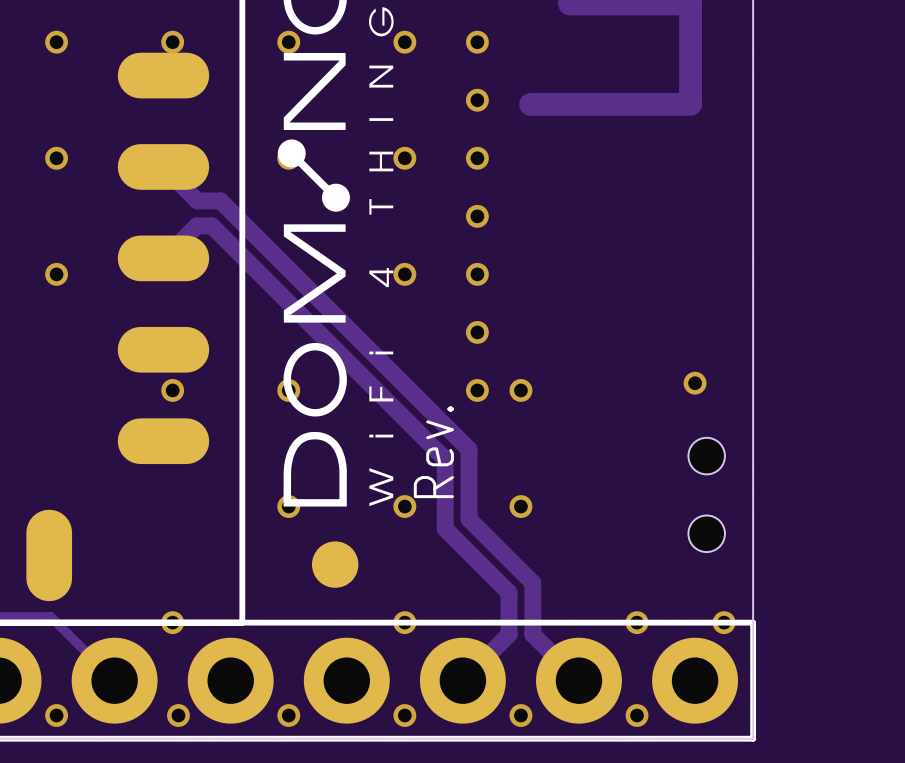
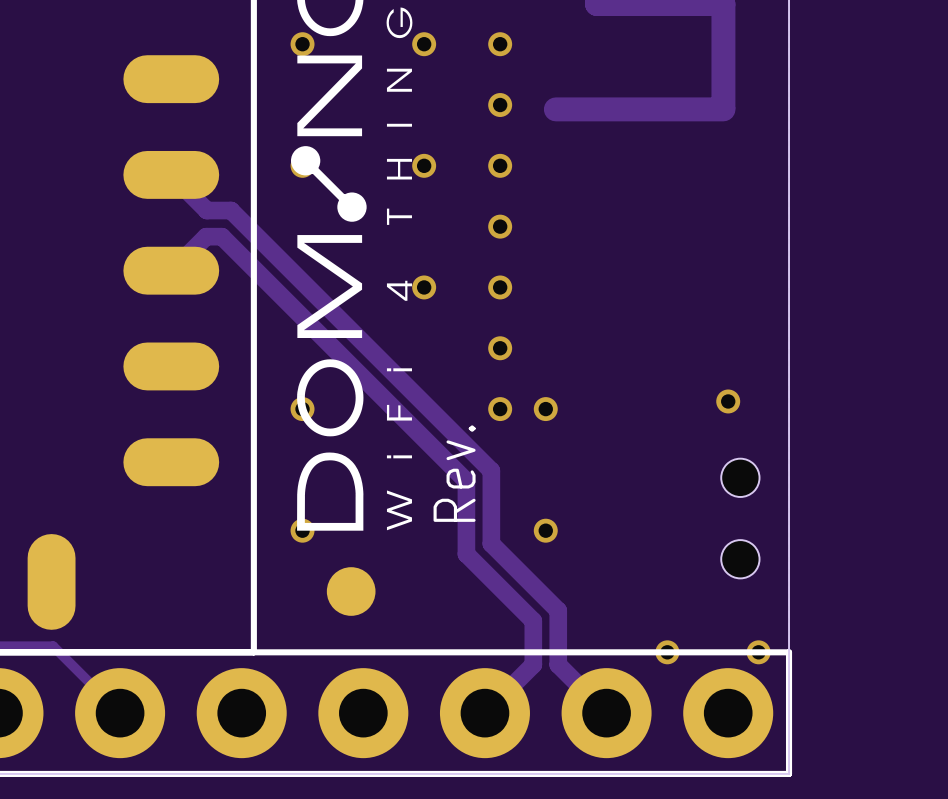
via: (56, 42) -> none
via: (172, 42) -> none
via: (56, 158) -> none
via: (56, 274) -> none
via: (172, 390) -> none
via: (404, 506) -> none
via: (172, 622) -> none
via: (404, 622) -> none
via: (56, 715) -> none
via: (178, 715) -> none
via: (288, 715) -> none
via: (404, 715) -> none
via: (520, 715) -> none
via: (637, 715) -> none

